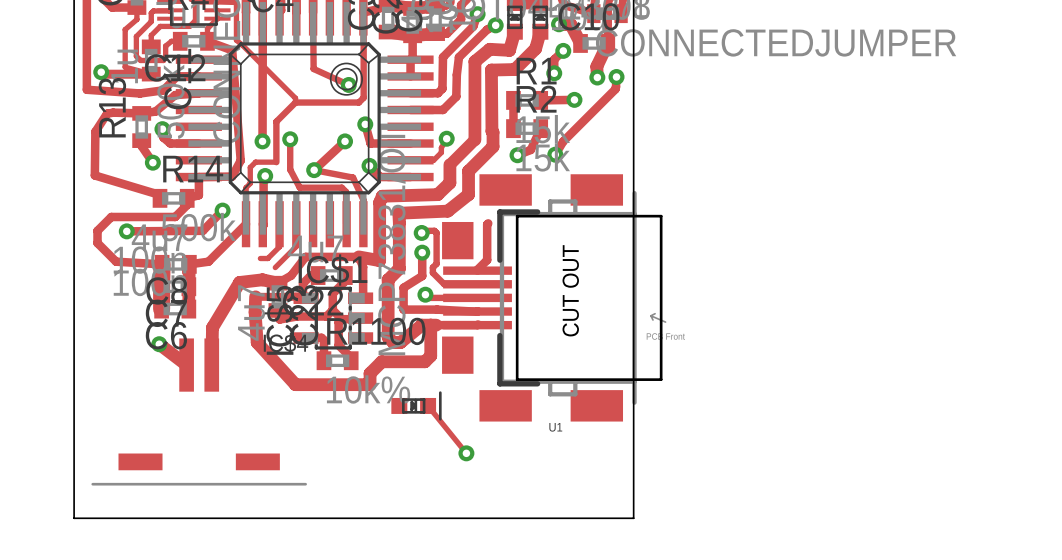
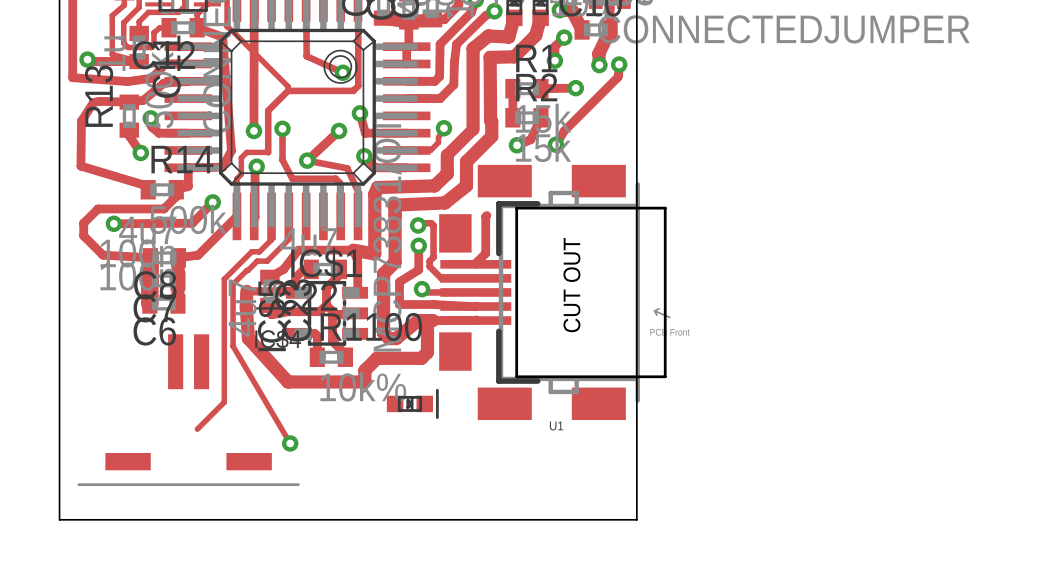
track: none -> (251, 251) (224, 279) (224, 402) (197, 429)
track: none -> (267, 261) (257, 261) (233, 284) (233, 346) (290, 443)
track: (277, 283) (262, 279) (239, 282) (212, 327) (211, 365) -> none
track: (159, 344) (186, 365) -> none
via: (159, 344) -> none
track: (428, 405) (466, 453) -> none
via: none -> (290, 443)
via: (466, 453) -> none

